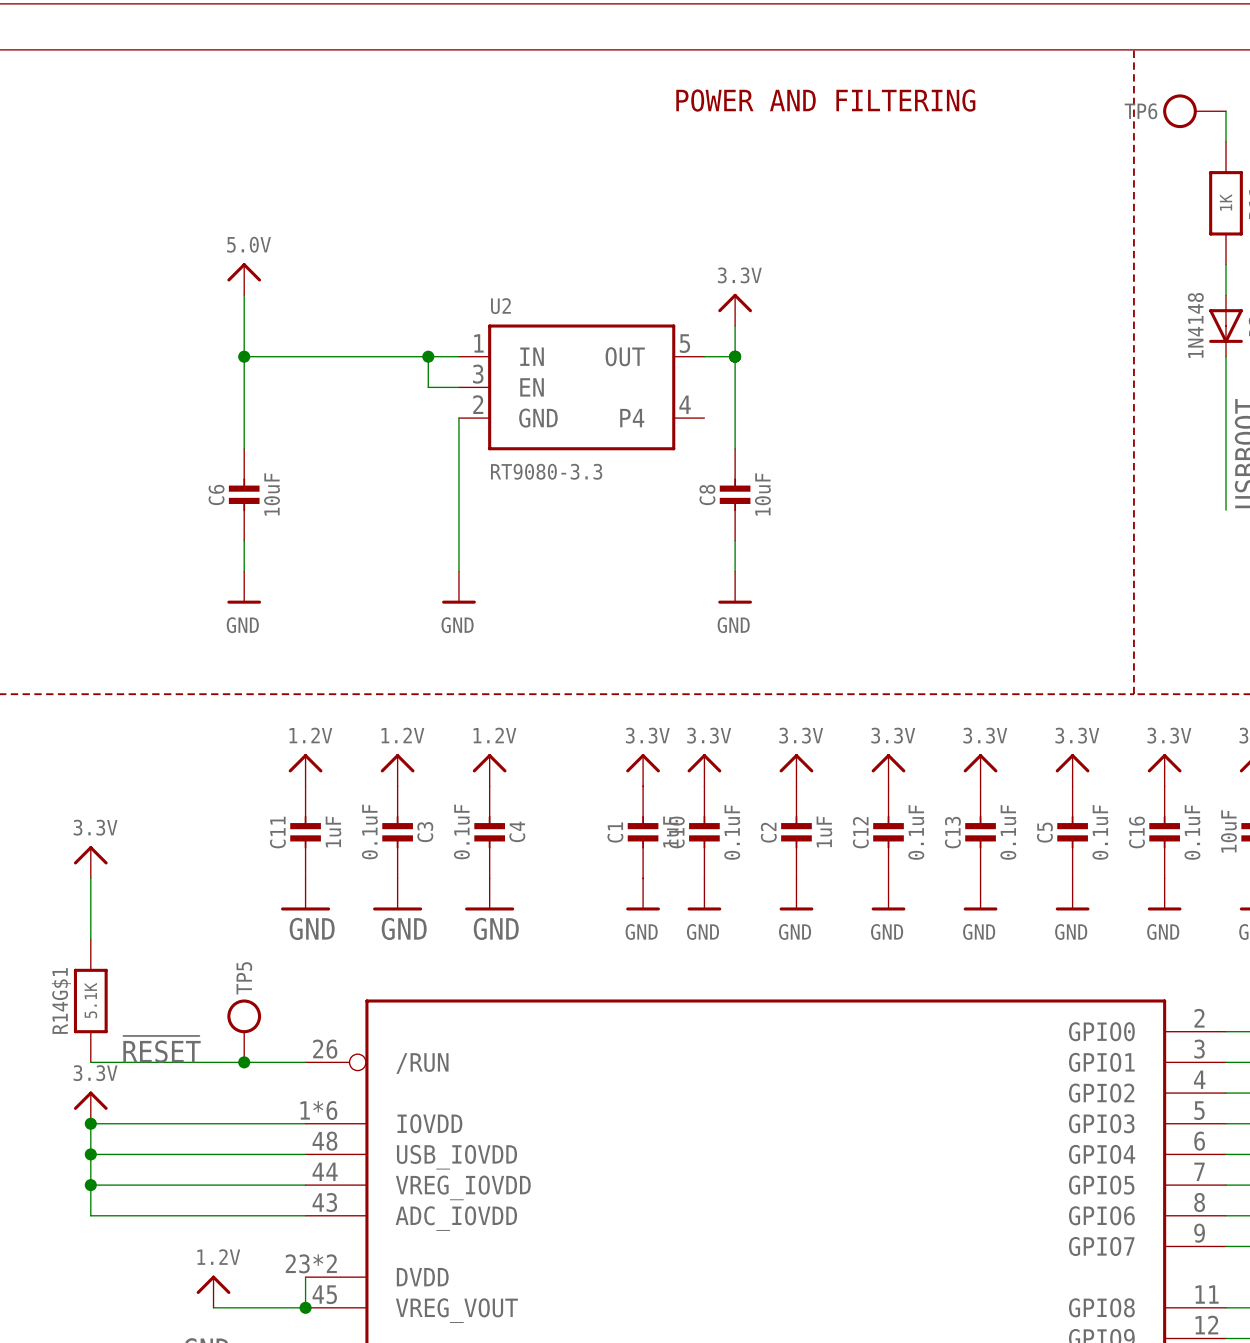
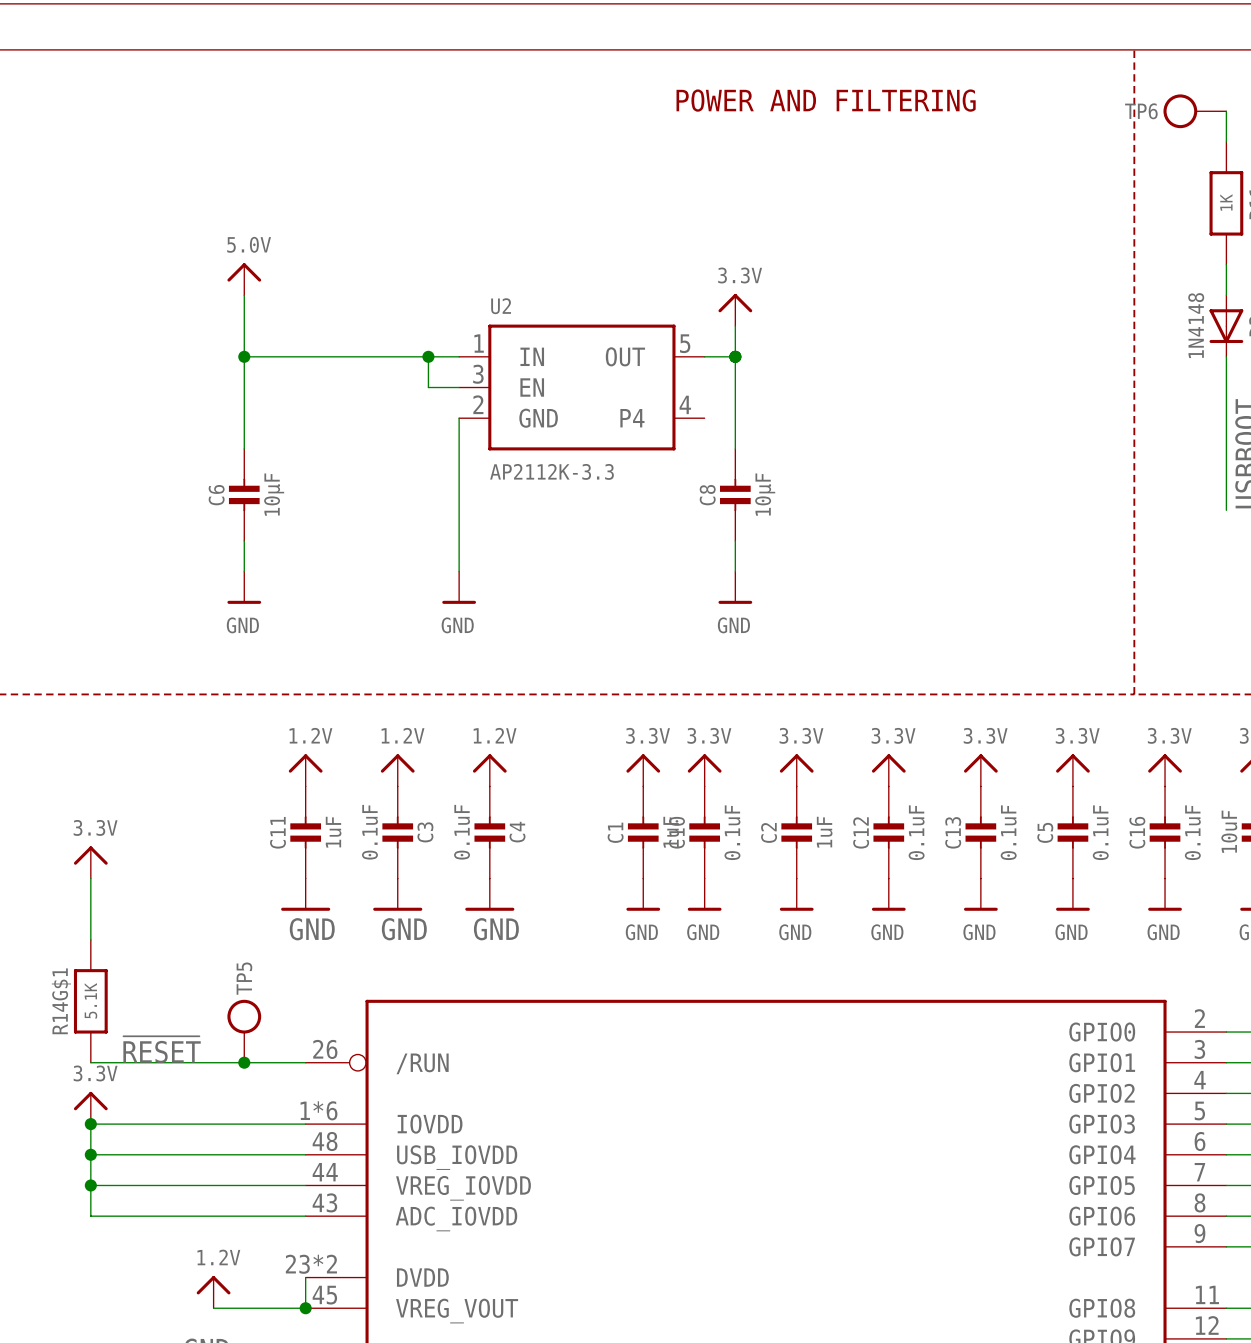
U2 value: RT9080-3.3 (546, 471) -> AP2112K-3.3 (552, 471)
C6 value: 10uF (272, 494) -> 10µF (274, 494)
C8 value: 10uF (762, 494) -> 10µF (765, 494)

